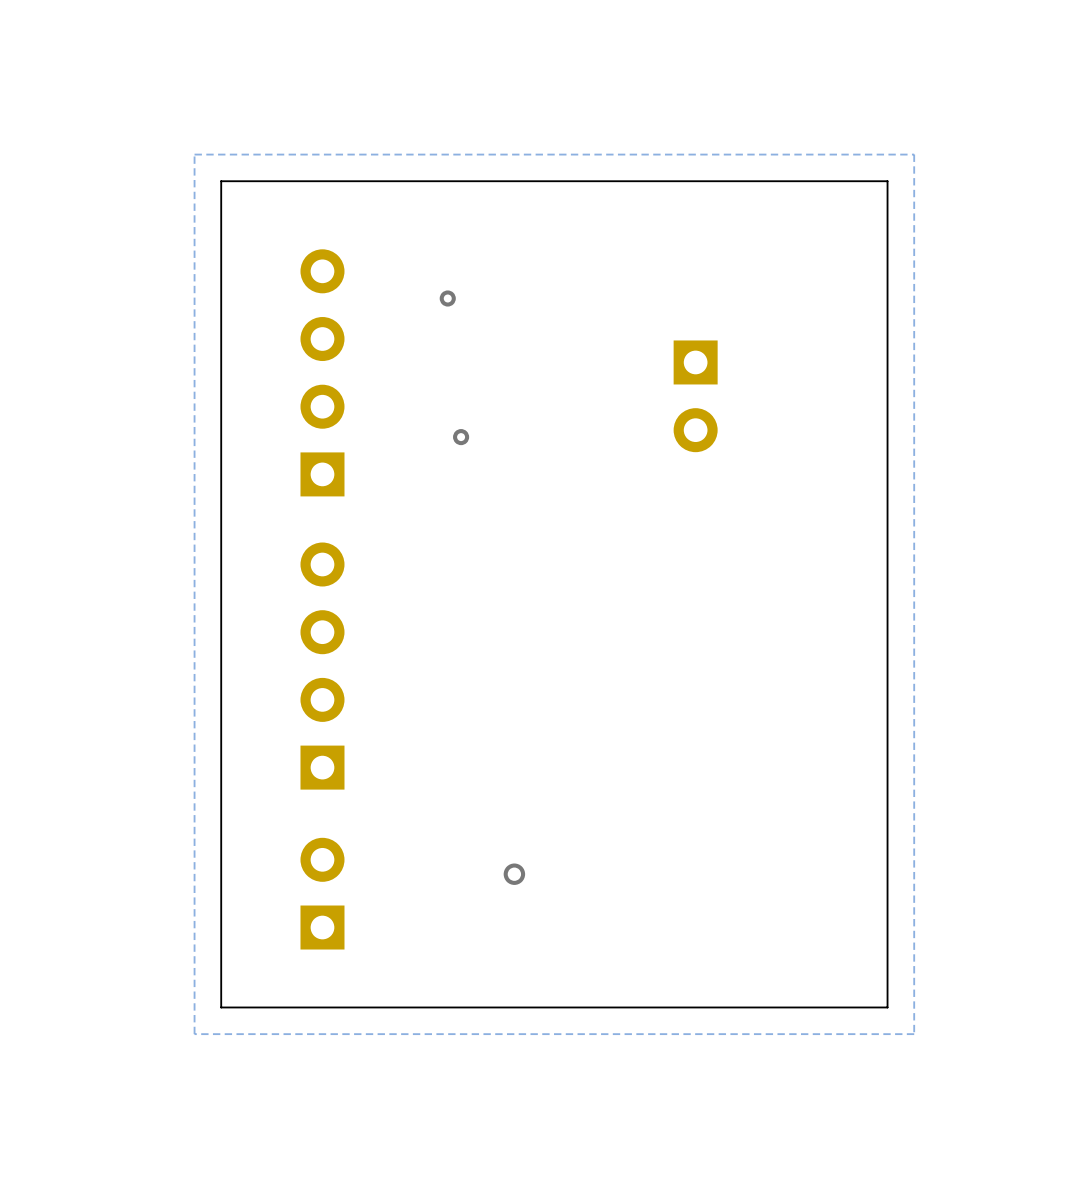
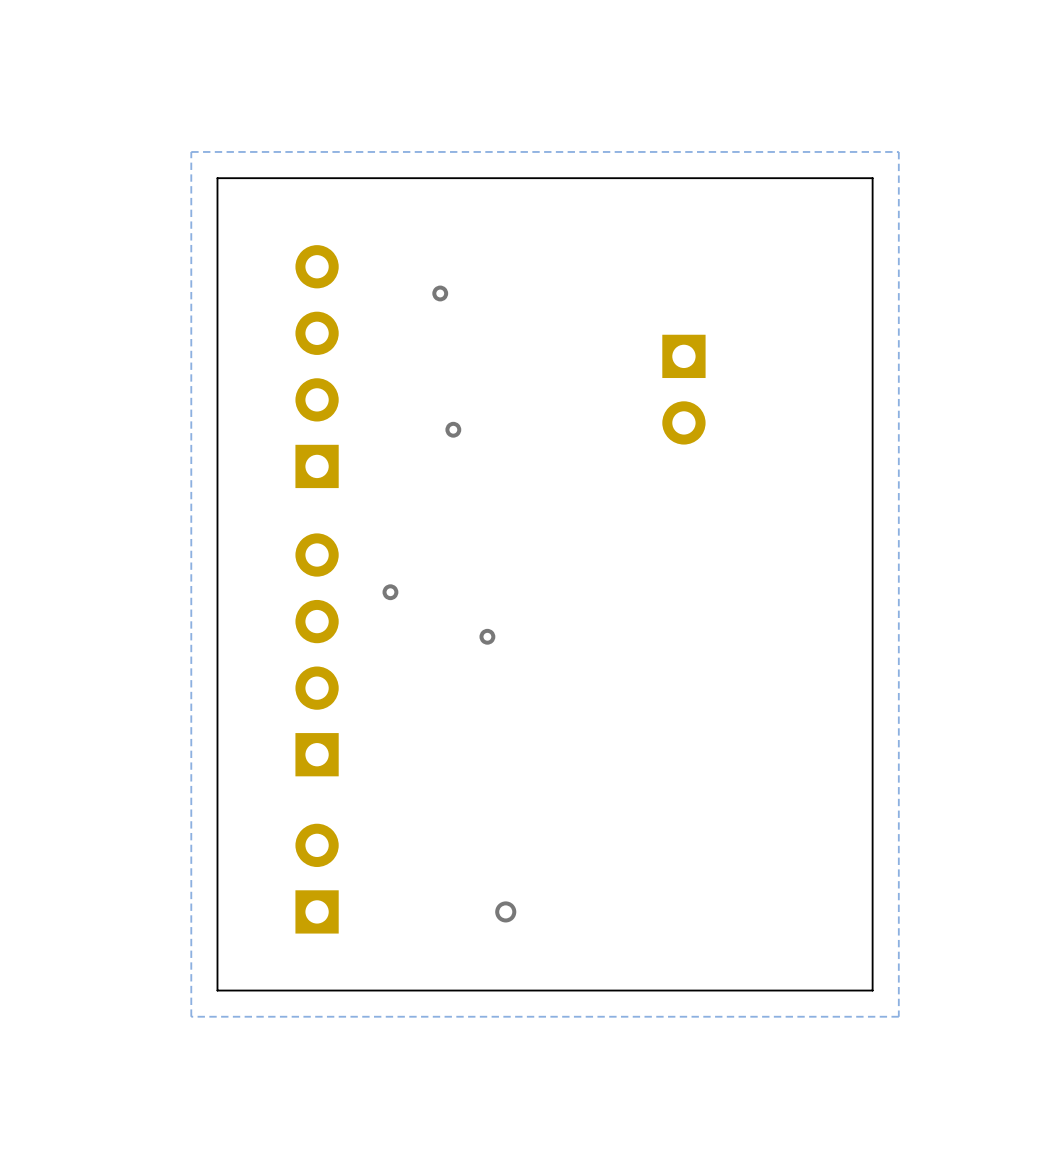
via: none -> (390, 592)
via: none -> (487, 636)
via position: (514, 874) -> (505, 911)

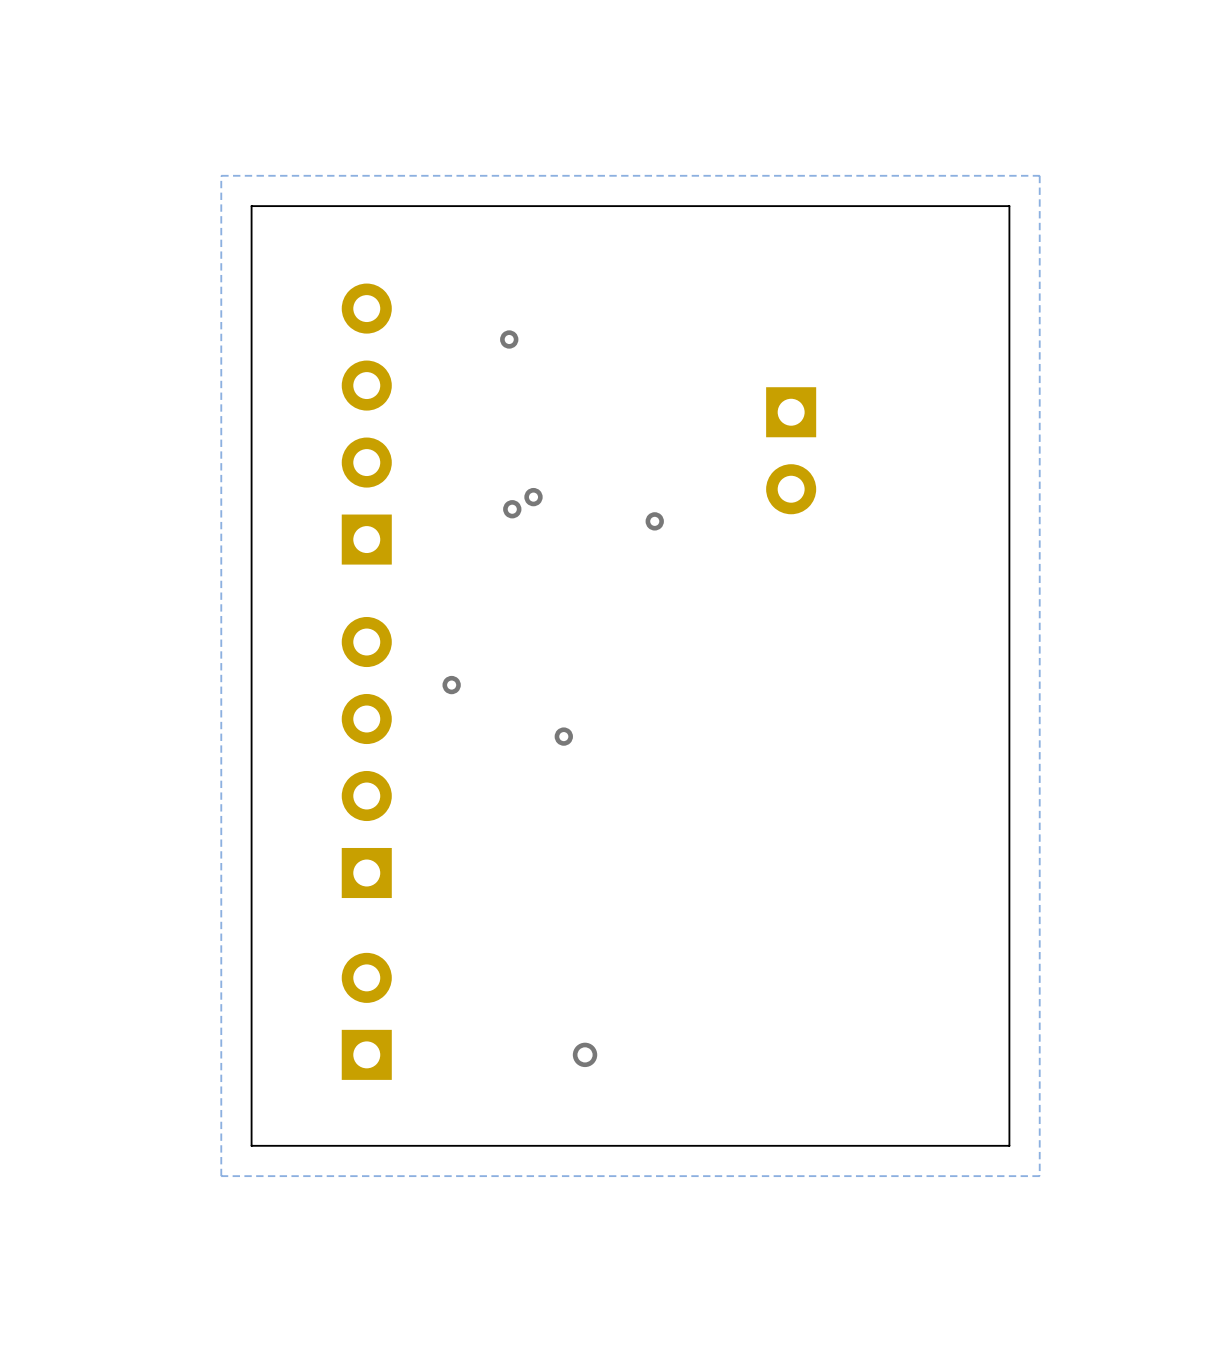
via: (453, 429) -> none
via: none -> (533, 497)
via: none -> (512, 509)
via: none -> (654, 521)

